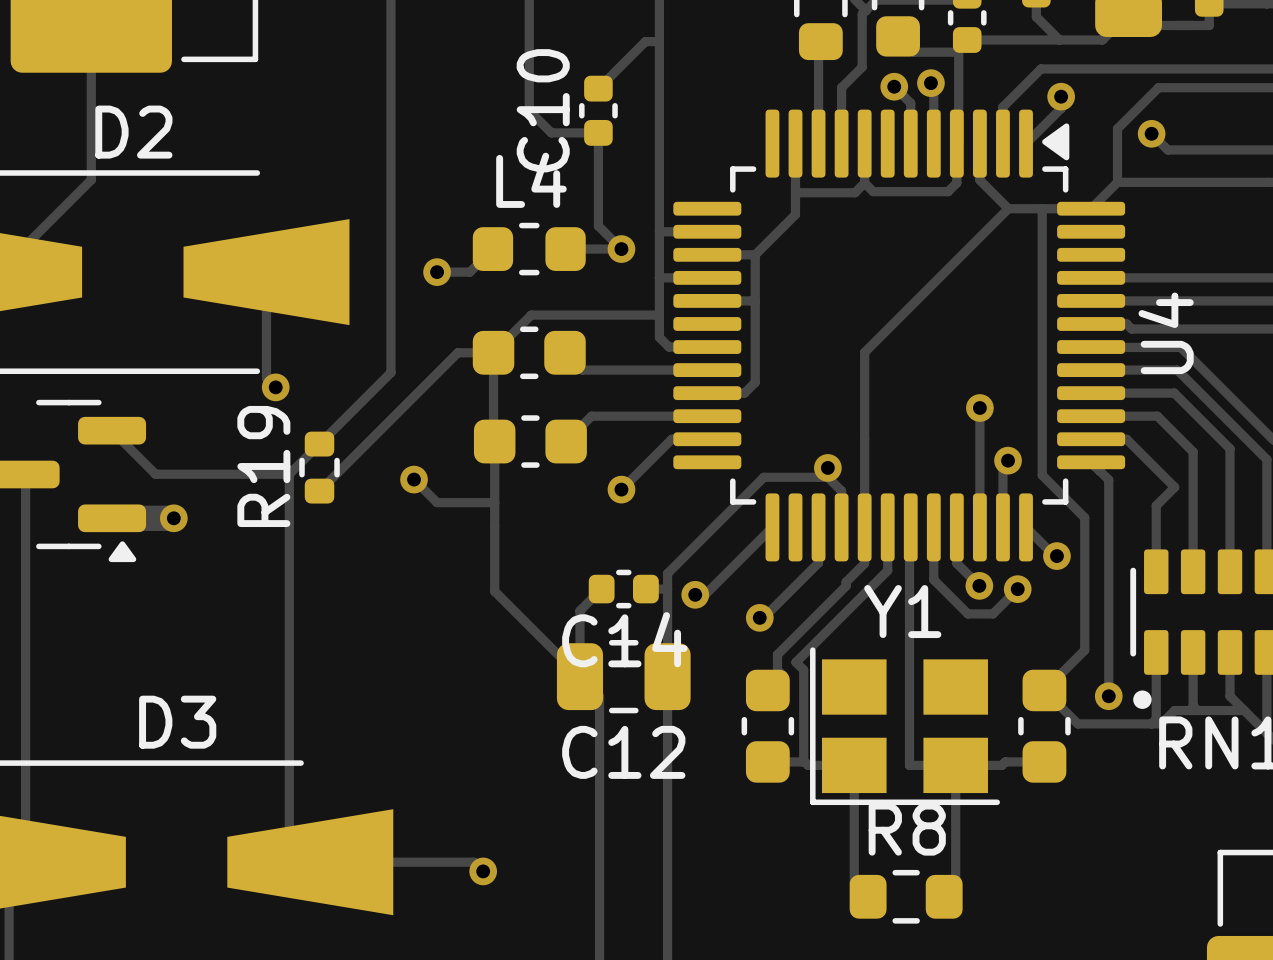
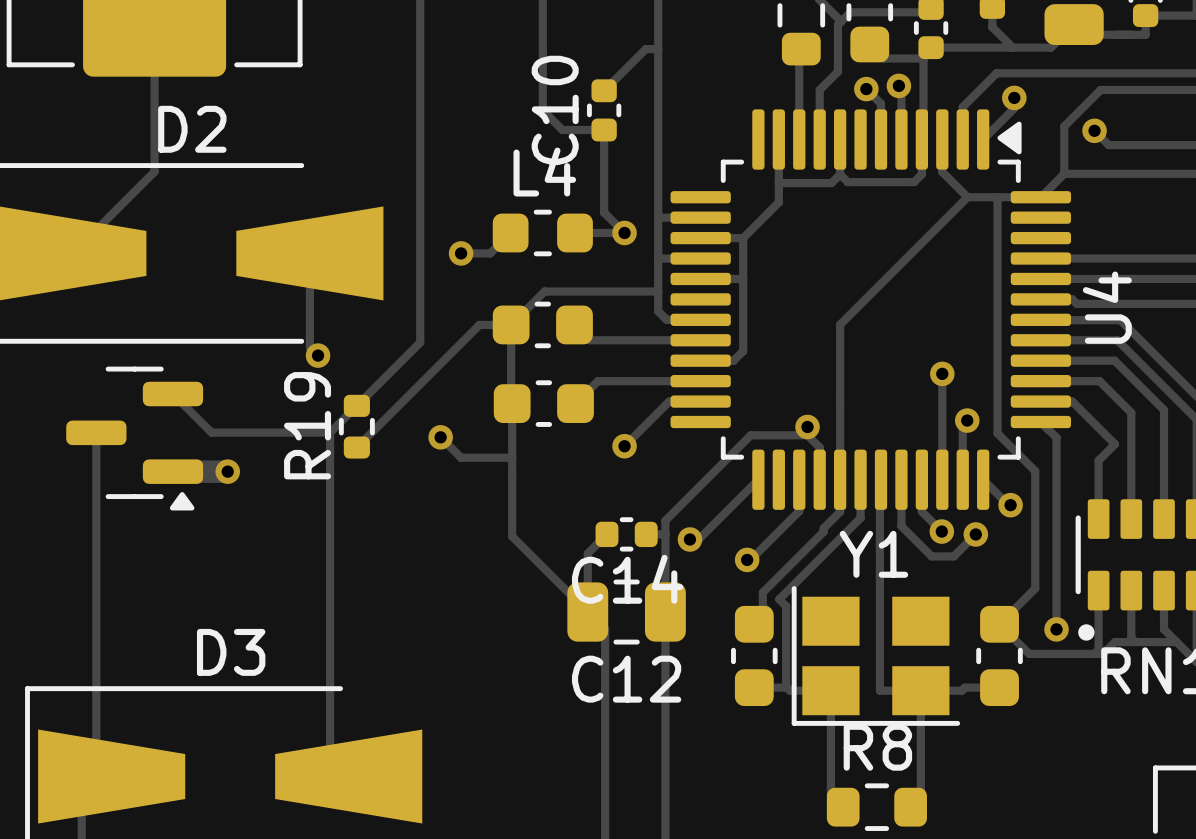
track: (310, 862) (473, 862) (483, 871) -> none
via: (483, 871) -> none

